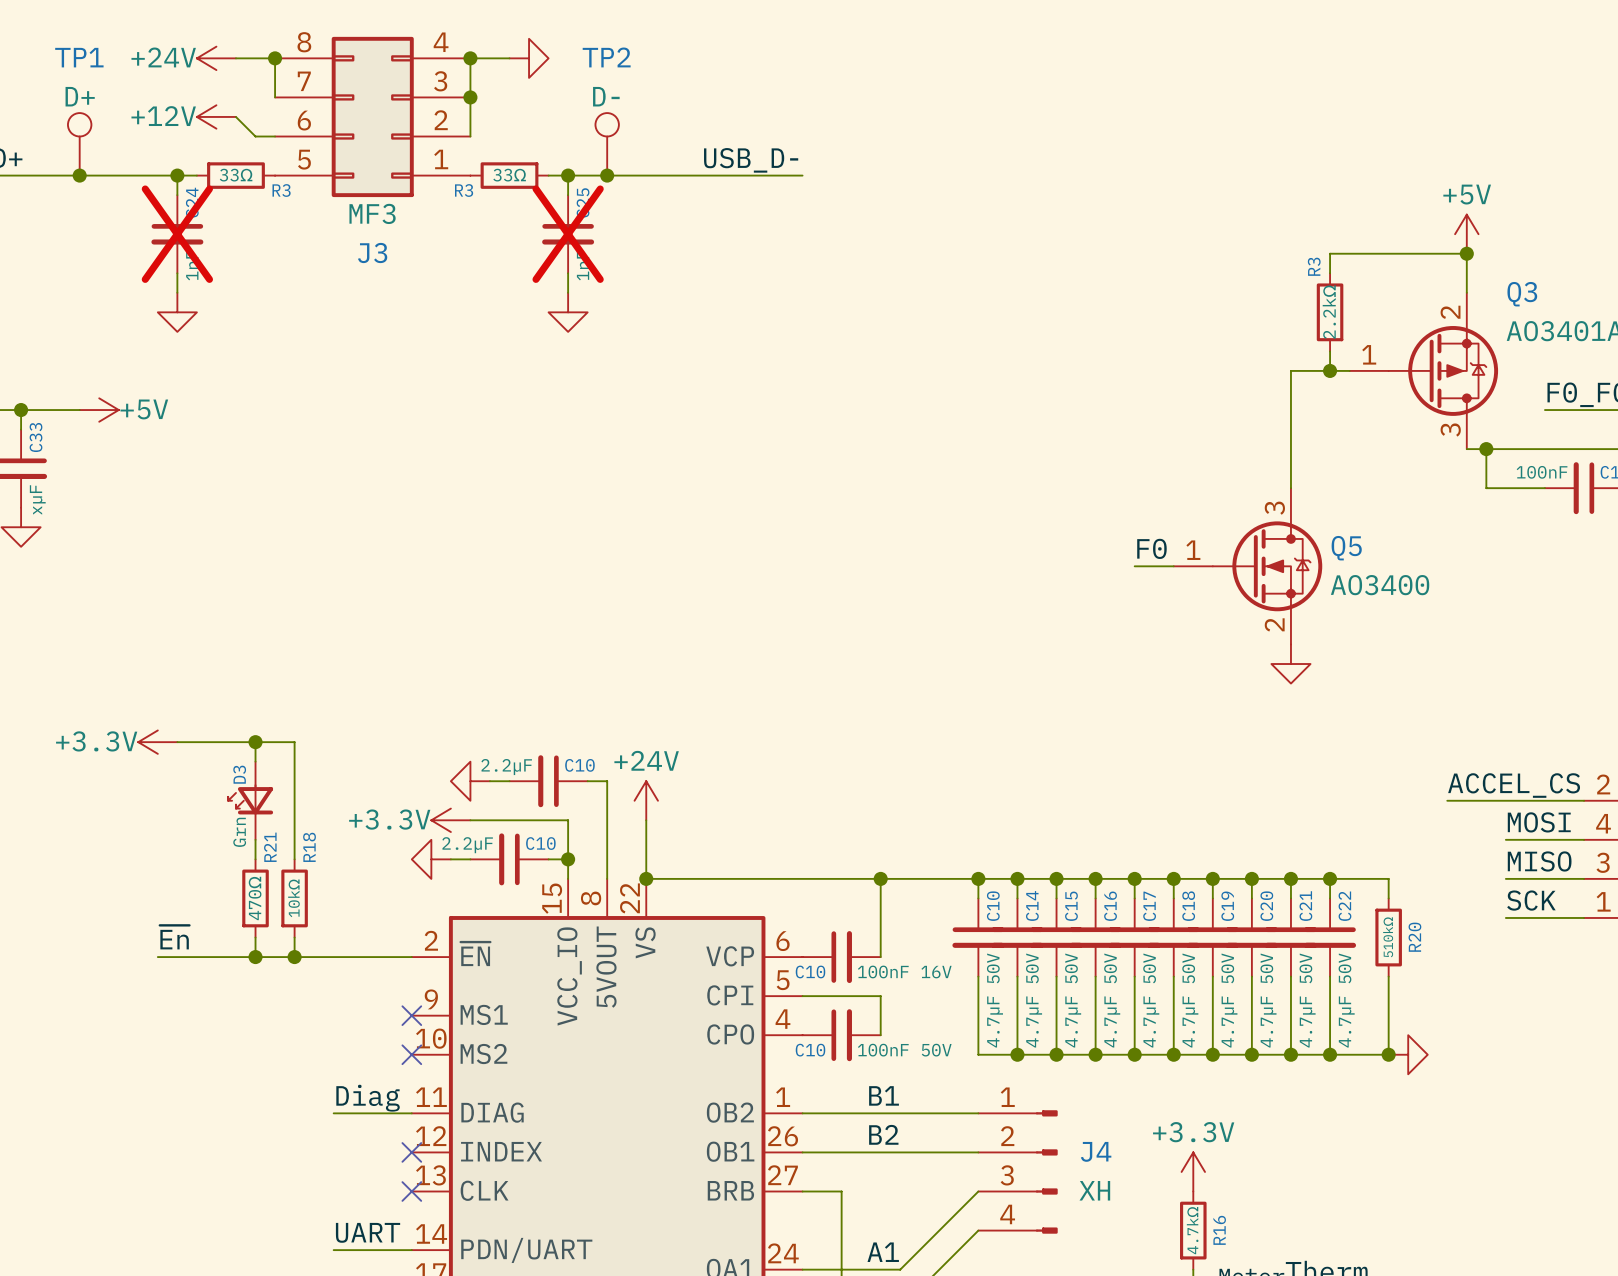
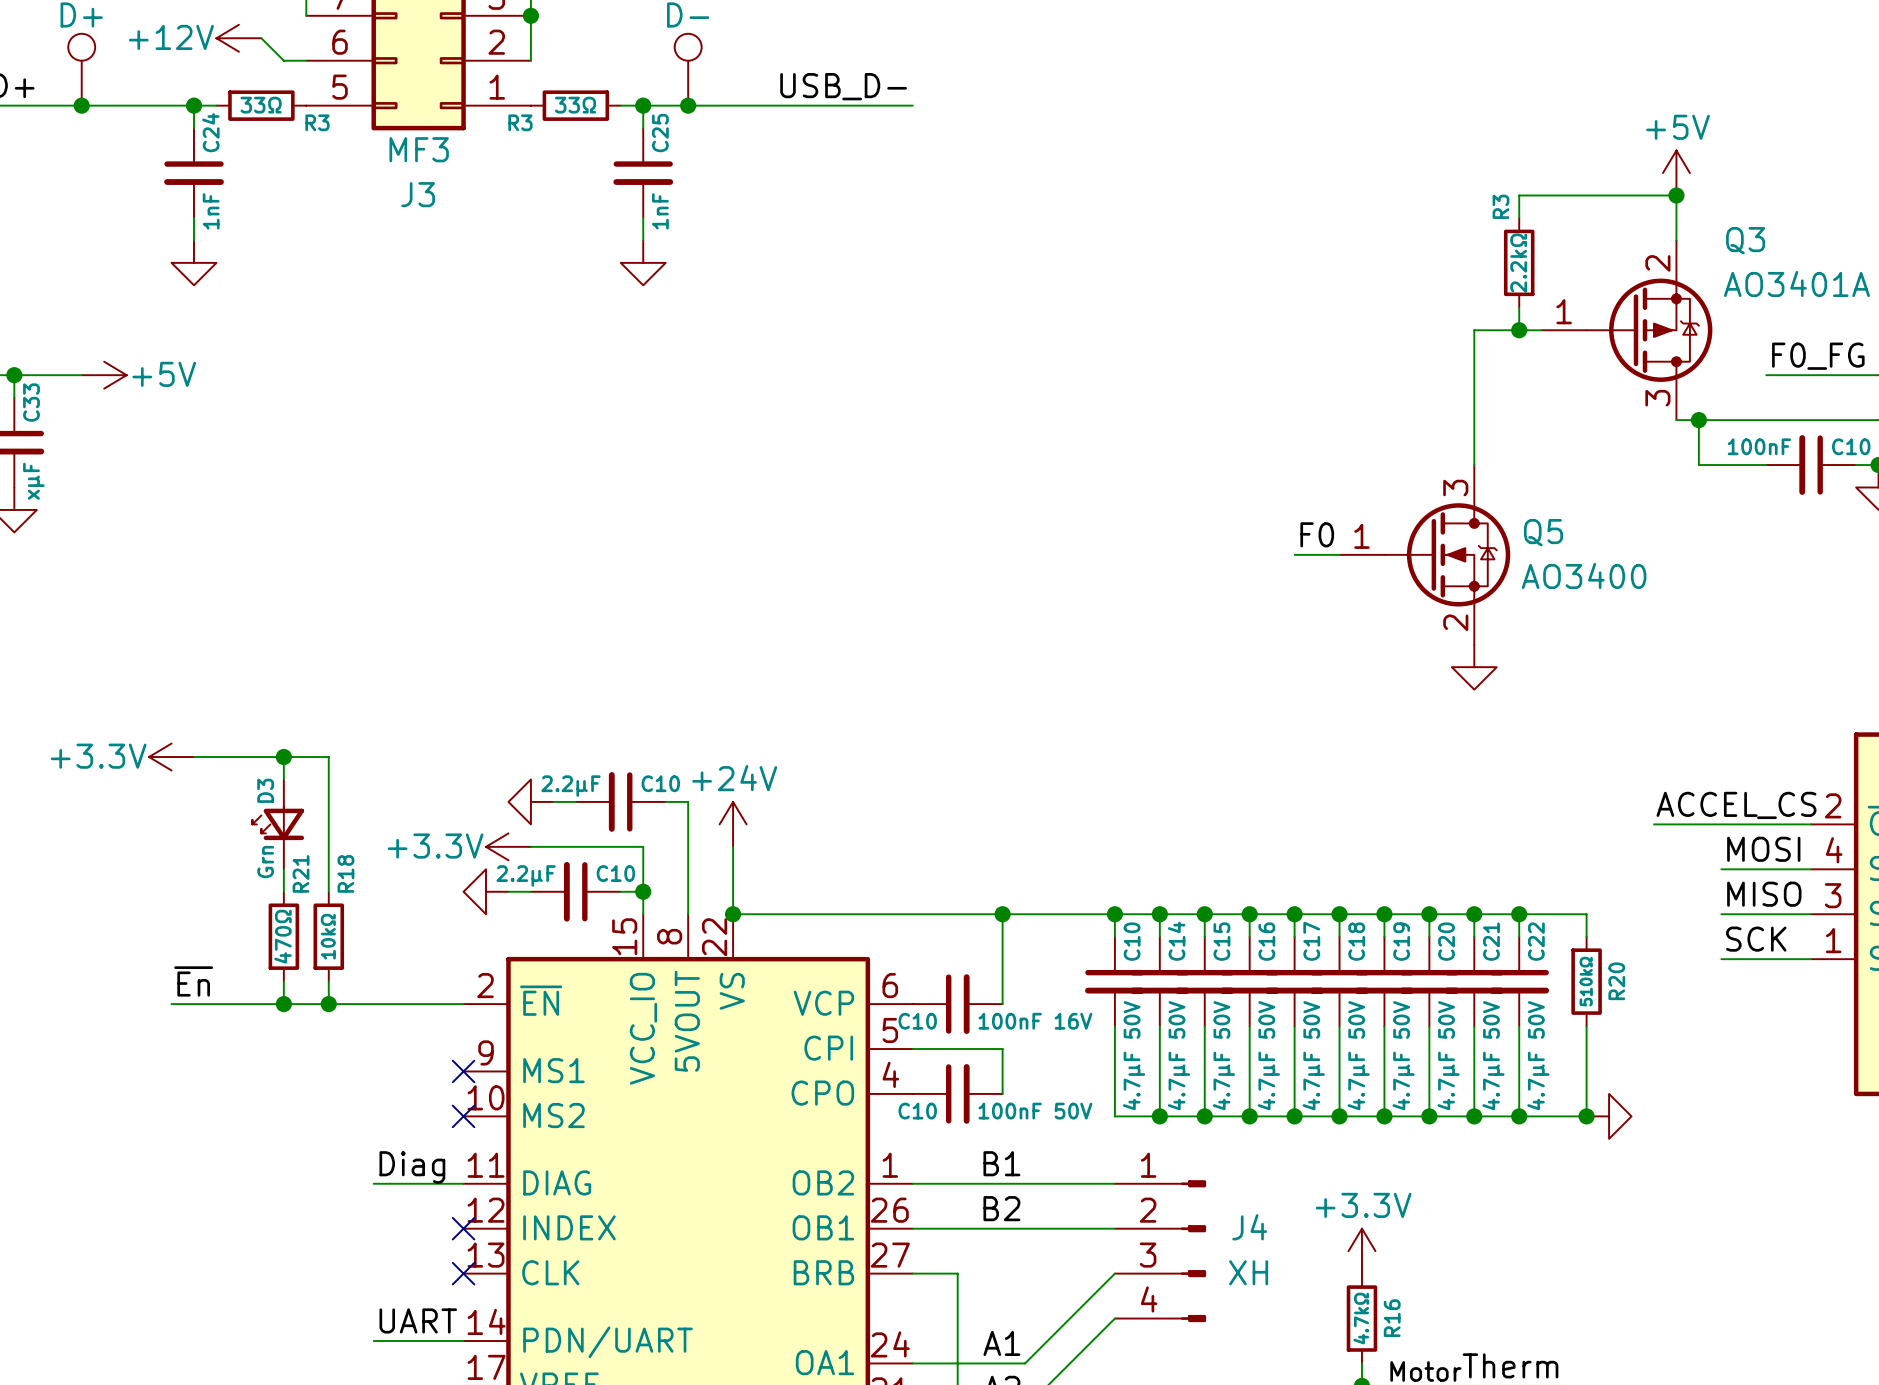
C24 do-not-place cross: (177, 234) -> none
C25 do-not-place cross: (568, 234) -> none

